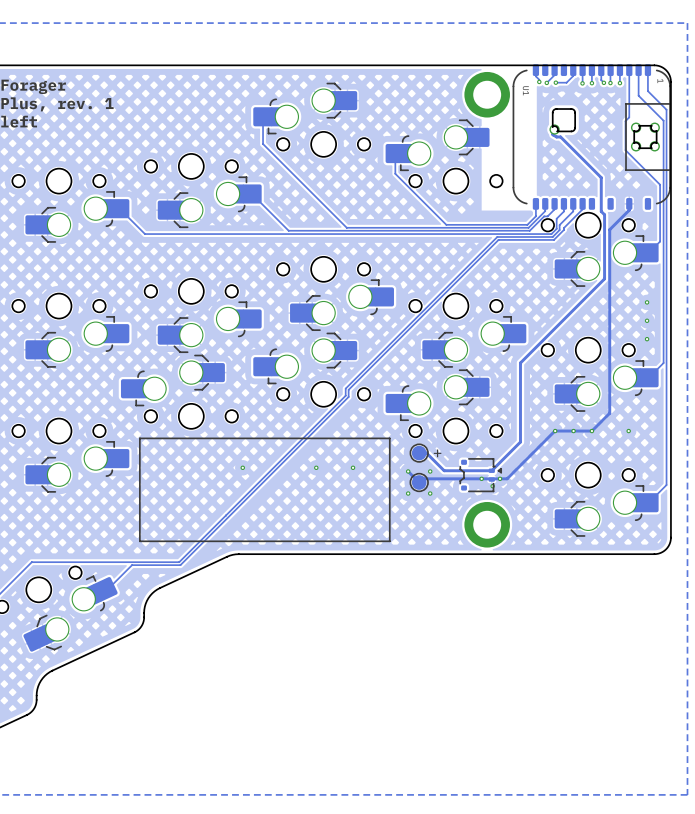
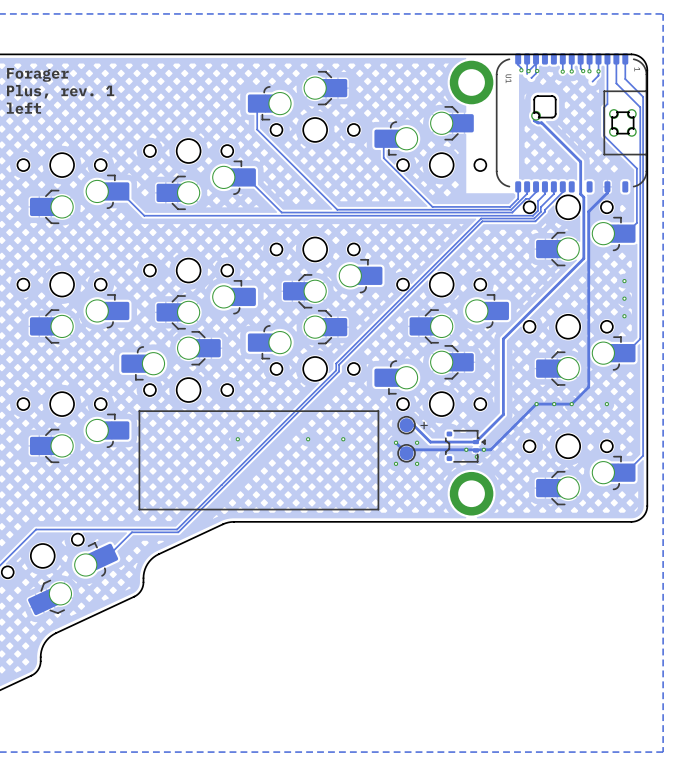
track: none -> (527, 58) (527, 74)
track: none -> (536, 58) (536, 73) (531, 77)
track: (573, 70) (573, 76) (566, 82) (555, 82) -> none
track: none -> (598, 71) (598, 75) (592, 81)

